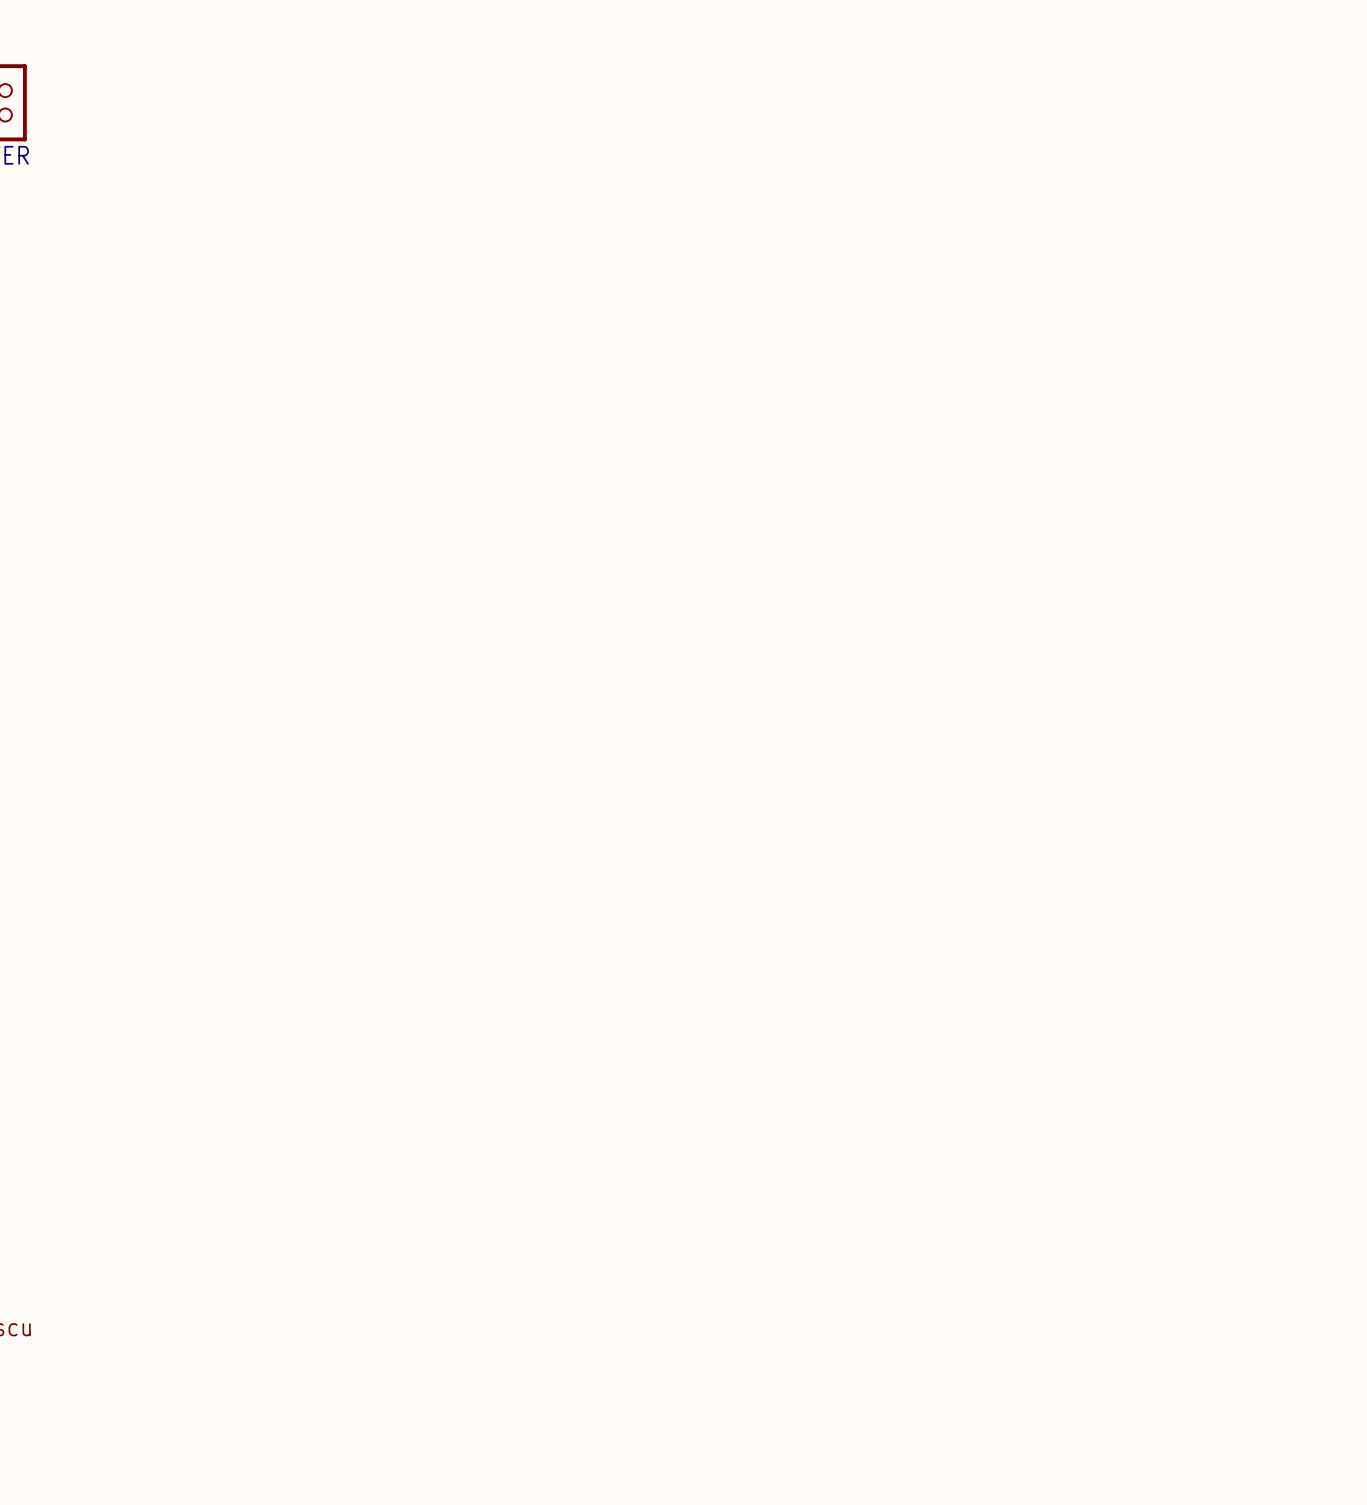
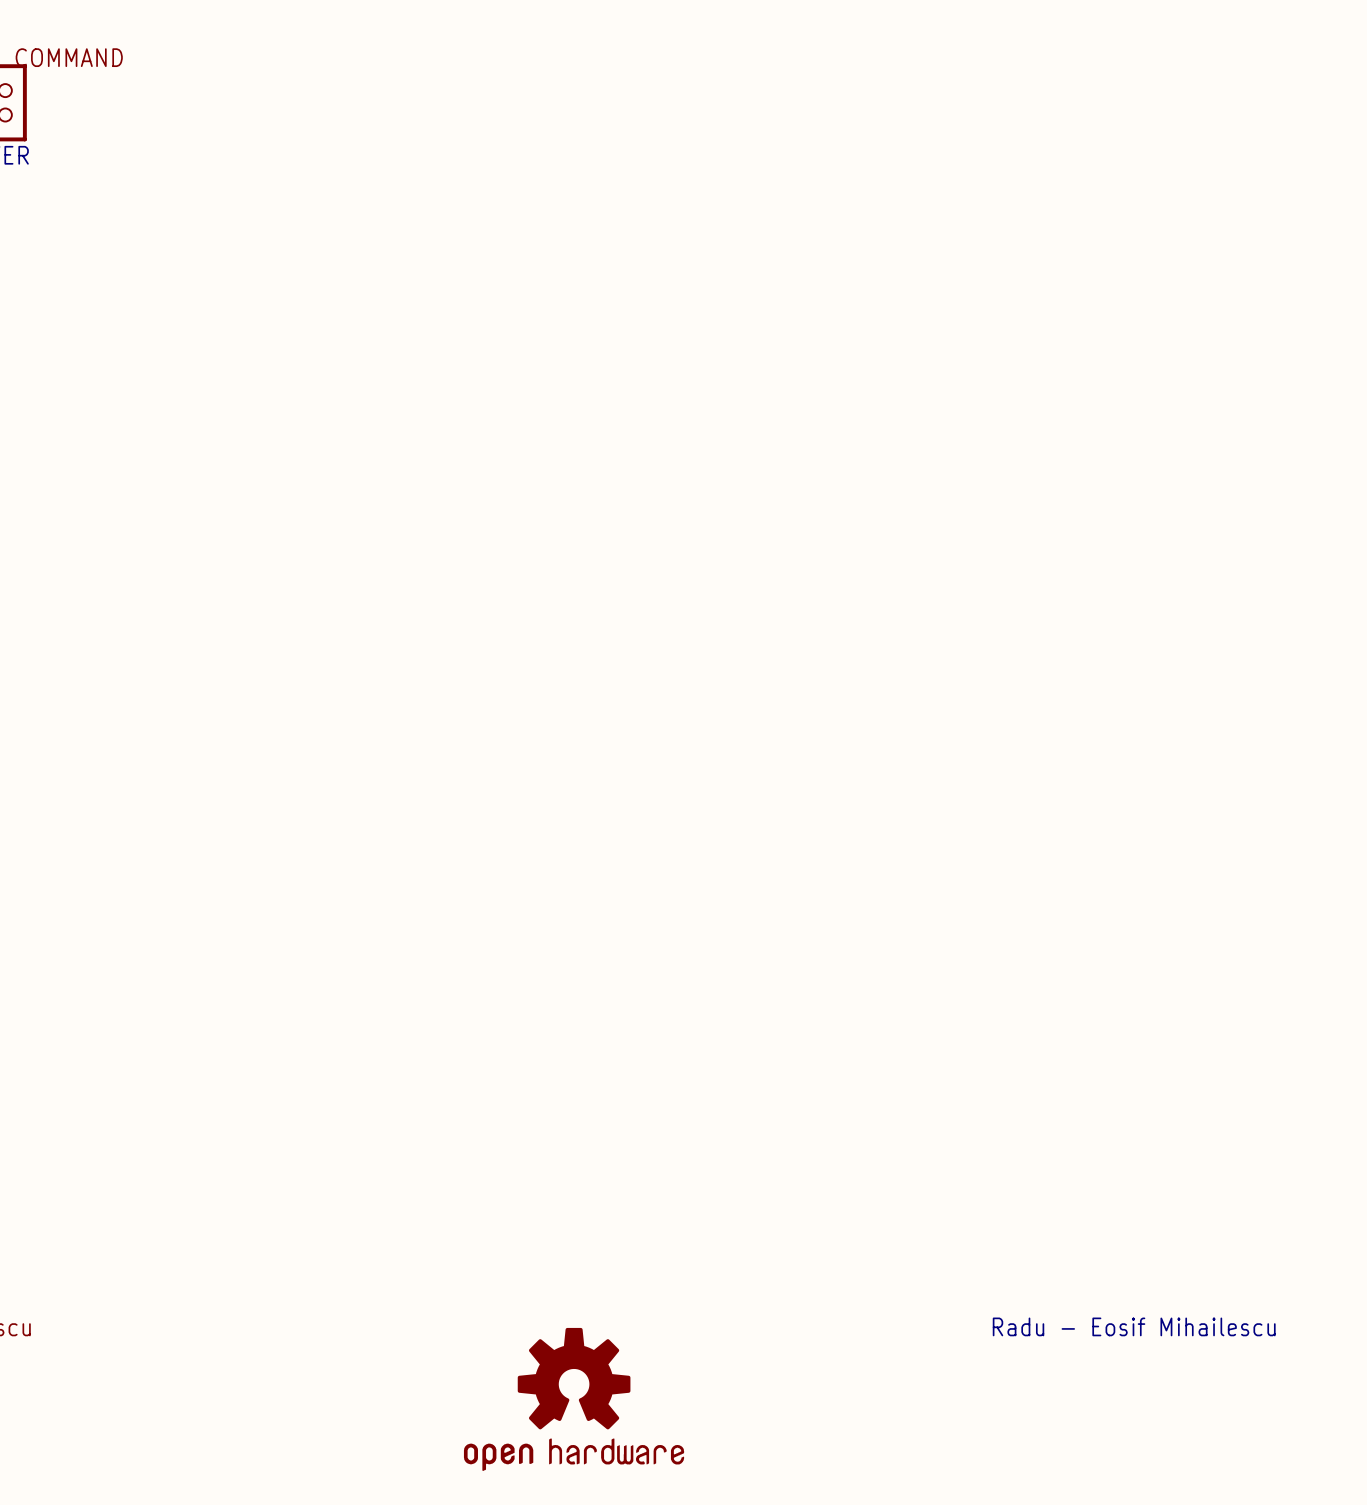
label: none -> COMMAND (69, 57)
text: none -> Radu - Eosif Mihailescu (1134, 1326)
part: none -> (574, 1399)

